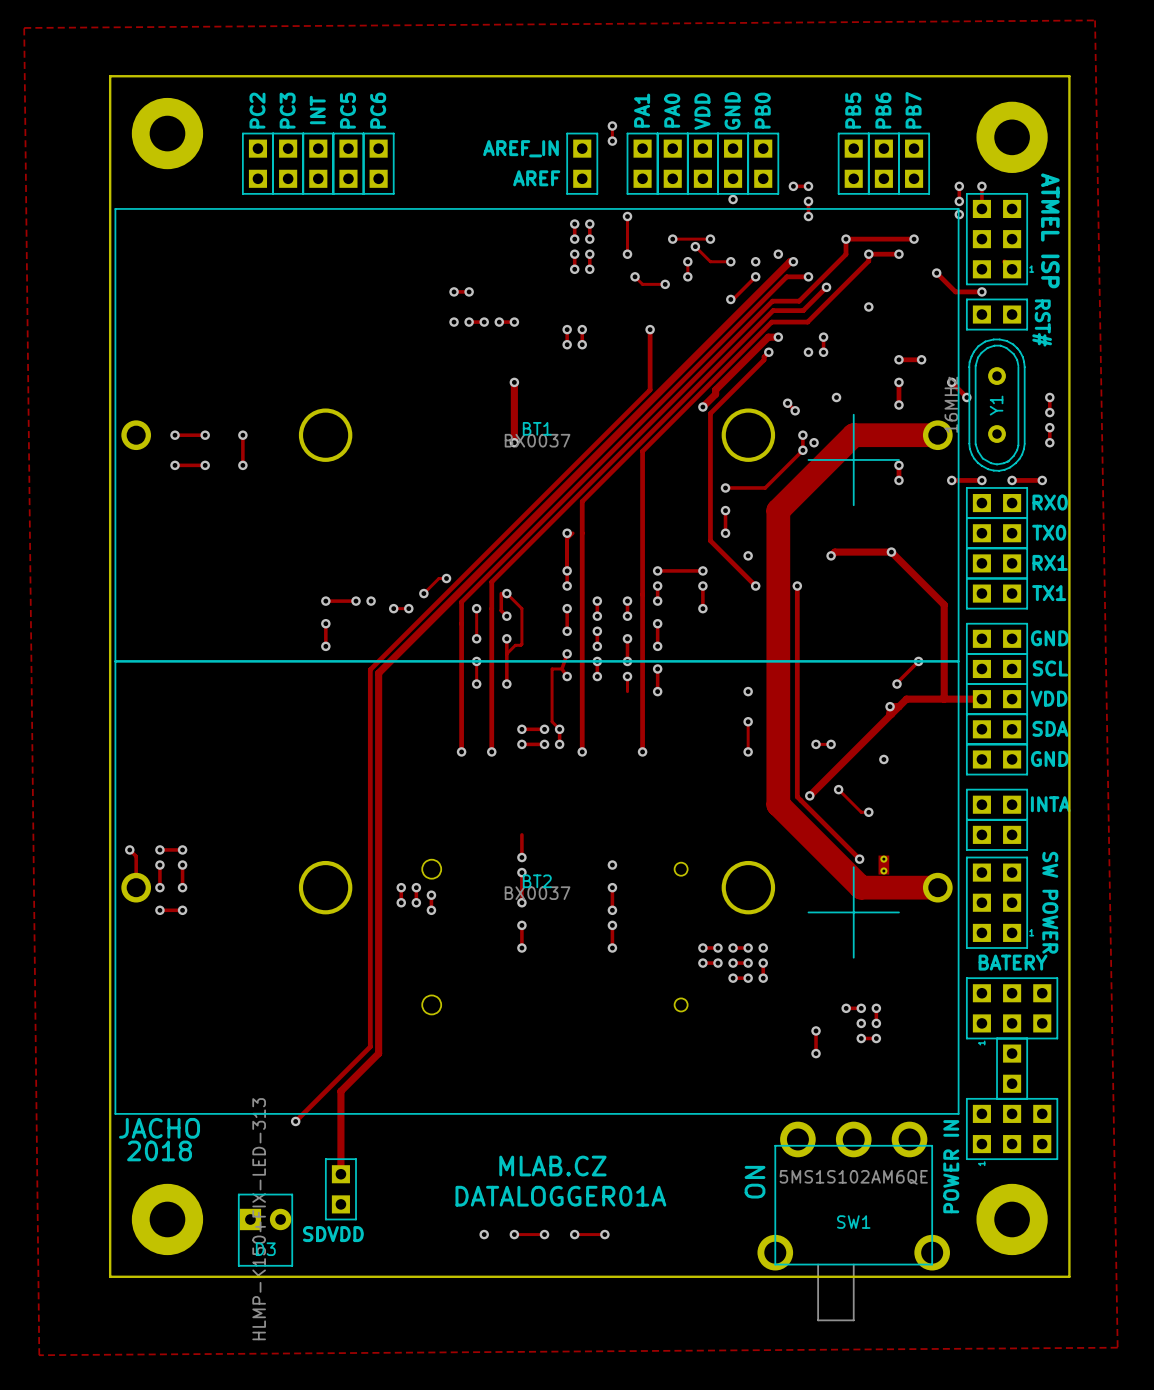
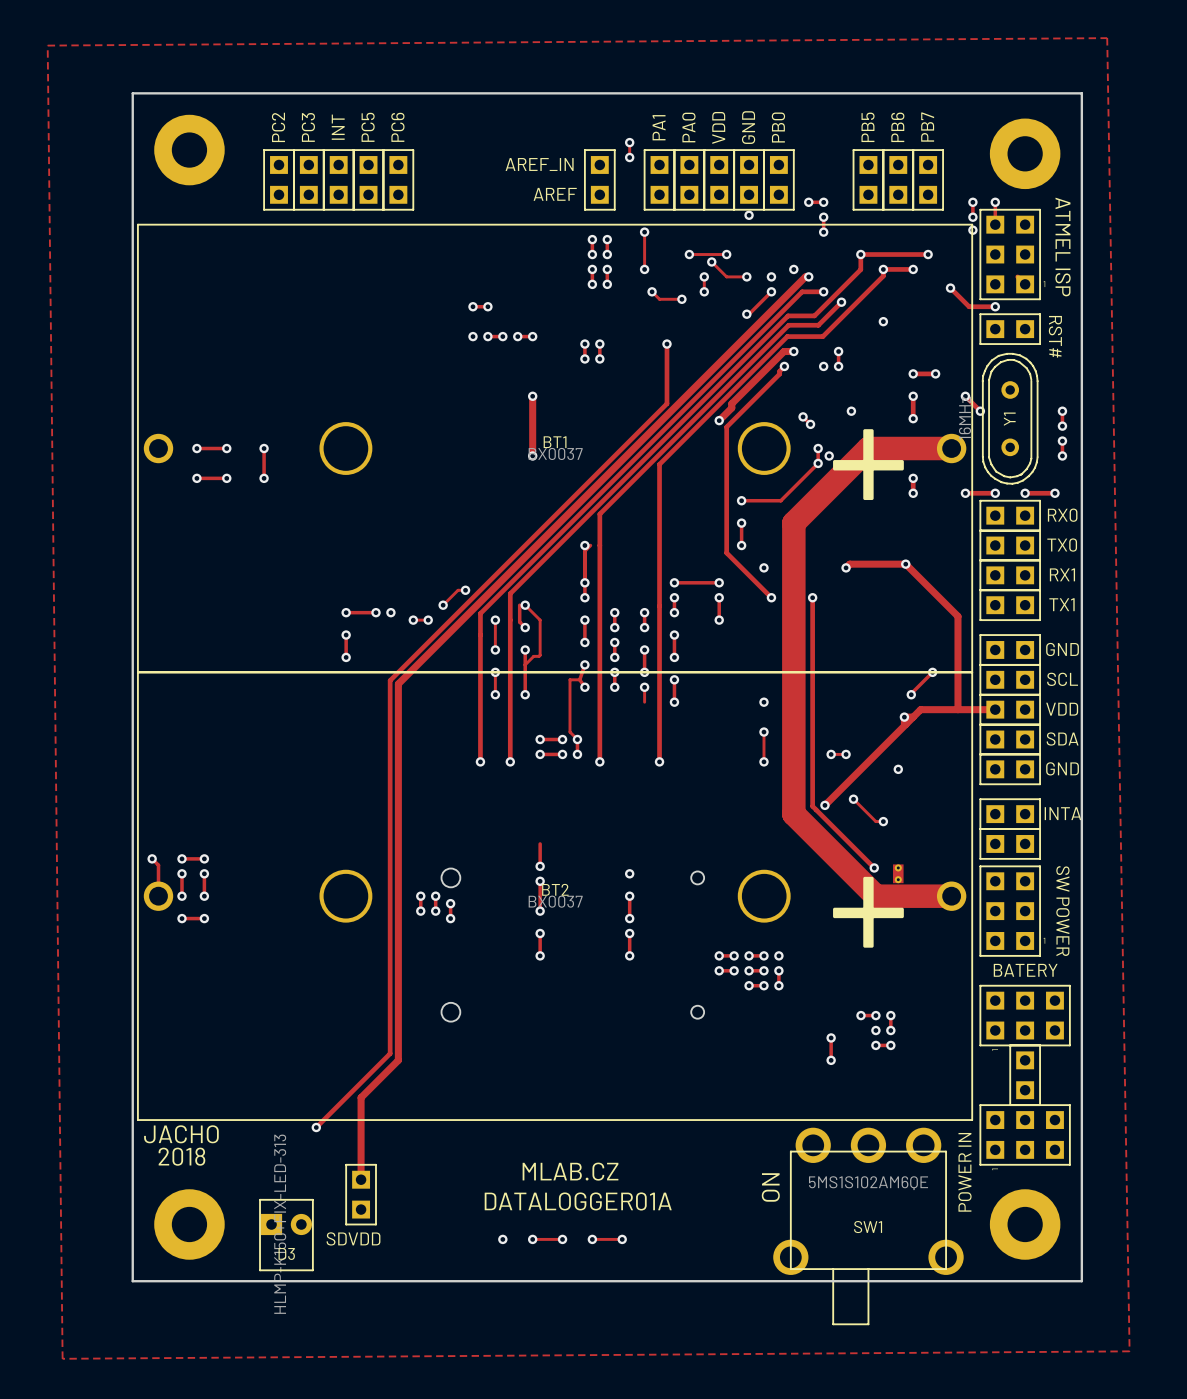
SW1 footprint: [757, 1121, 950, 1322] -> [773, 1127, 964, 1326]

